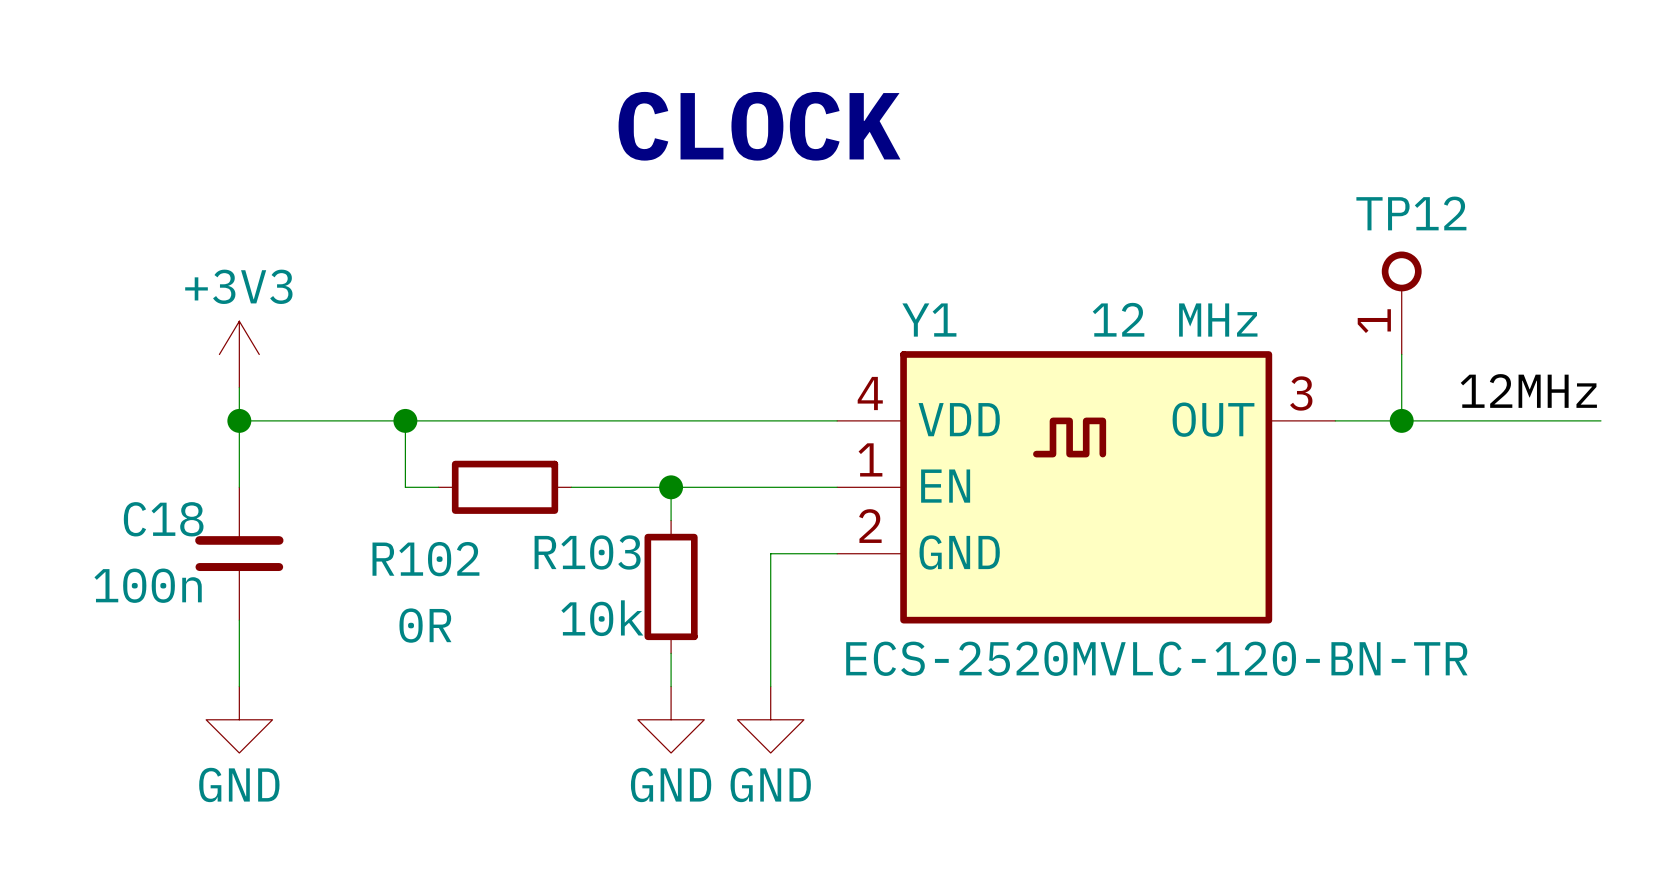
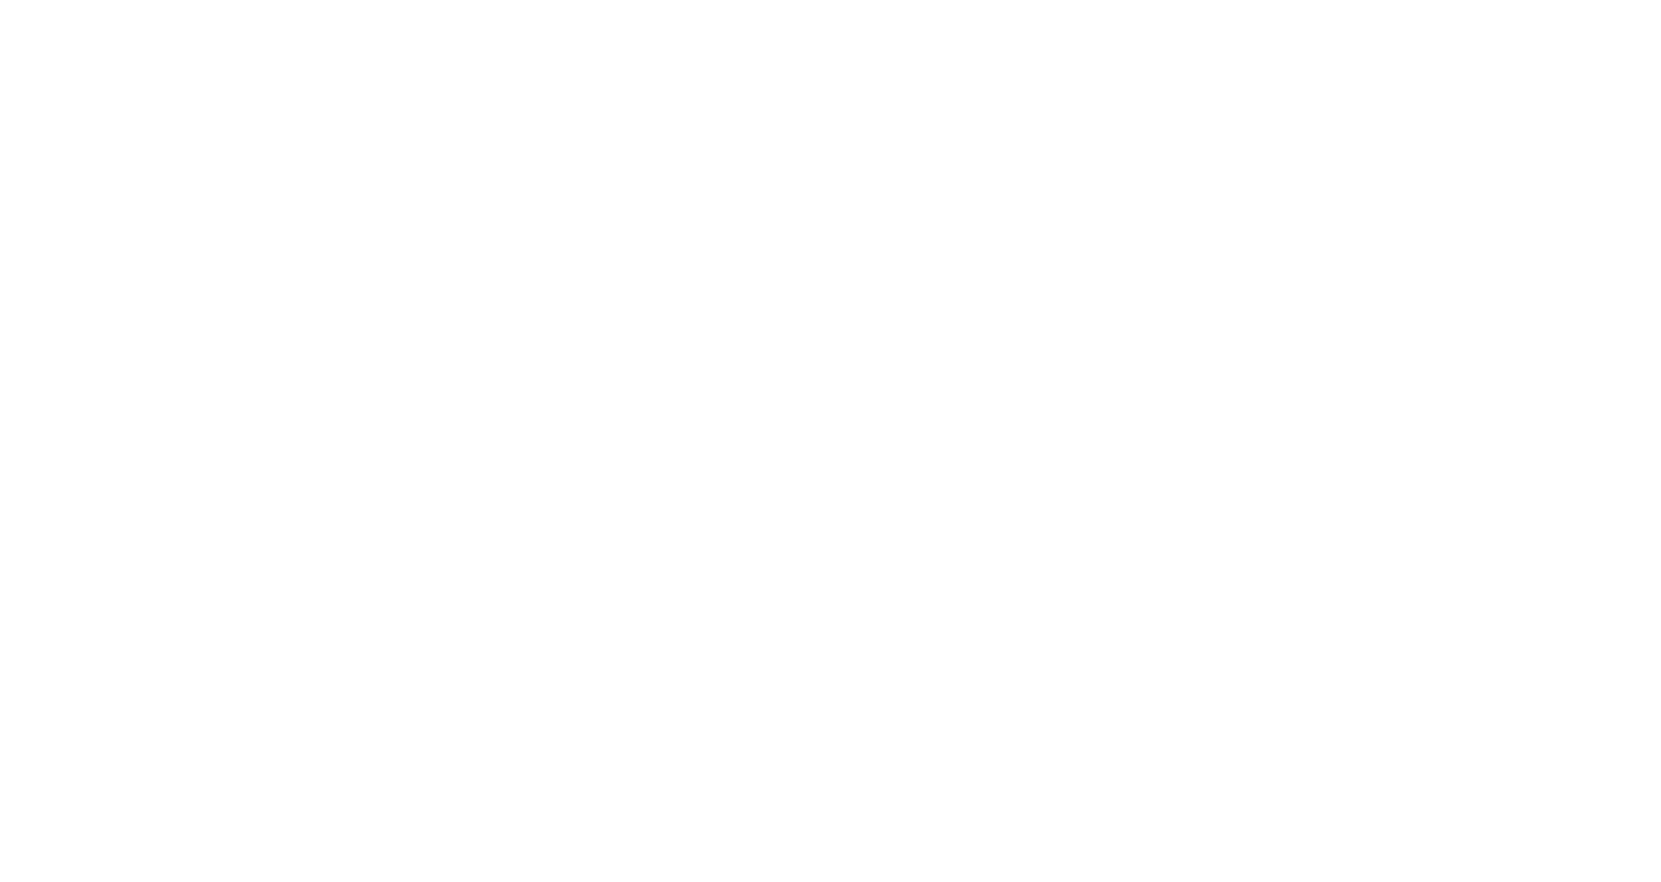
text: CLOCK (759, 126) -> none
TP12: (1401, 302) -> none
power symbol: +3V3 (239, 354) -> none
wire: (1401, 354) (1401, 420) -> none
wire: (239, 387) (239, 487) -> none
label: 12MHz (1528, 390) -> none
wire: (239, 420) (837, 420) -> none
junction: (239, 420) -> none
wire: (405, 420) (405, 487) (438, 487) -> none
junction: (405, 420) -> none
wire: (1335, 420) (1600, 420) -> none
junction: (1401, 420) -> none
R102: (505, 487) -> none
wire: (571, 487) (837, 487) -> none
wire: (671, 487) (671, 520) -> none
junction: (671, 487) -> none
Y1: (1086, 487) -> none
C18: (239, 553) -> none
wire: (837, 553) (770, 553) (770, 686) -> none
R103: (671, 586) -> none
wire: (239, 620) (239, 686) -> none
wire: (671, 653) (671, 686) -> none
power symbol: GND (239, 719) -> none
power symbol: GND (671, 719) -> none
power symbol: GND (770, 719) -> none

